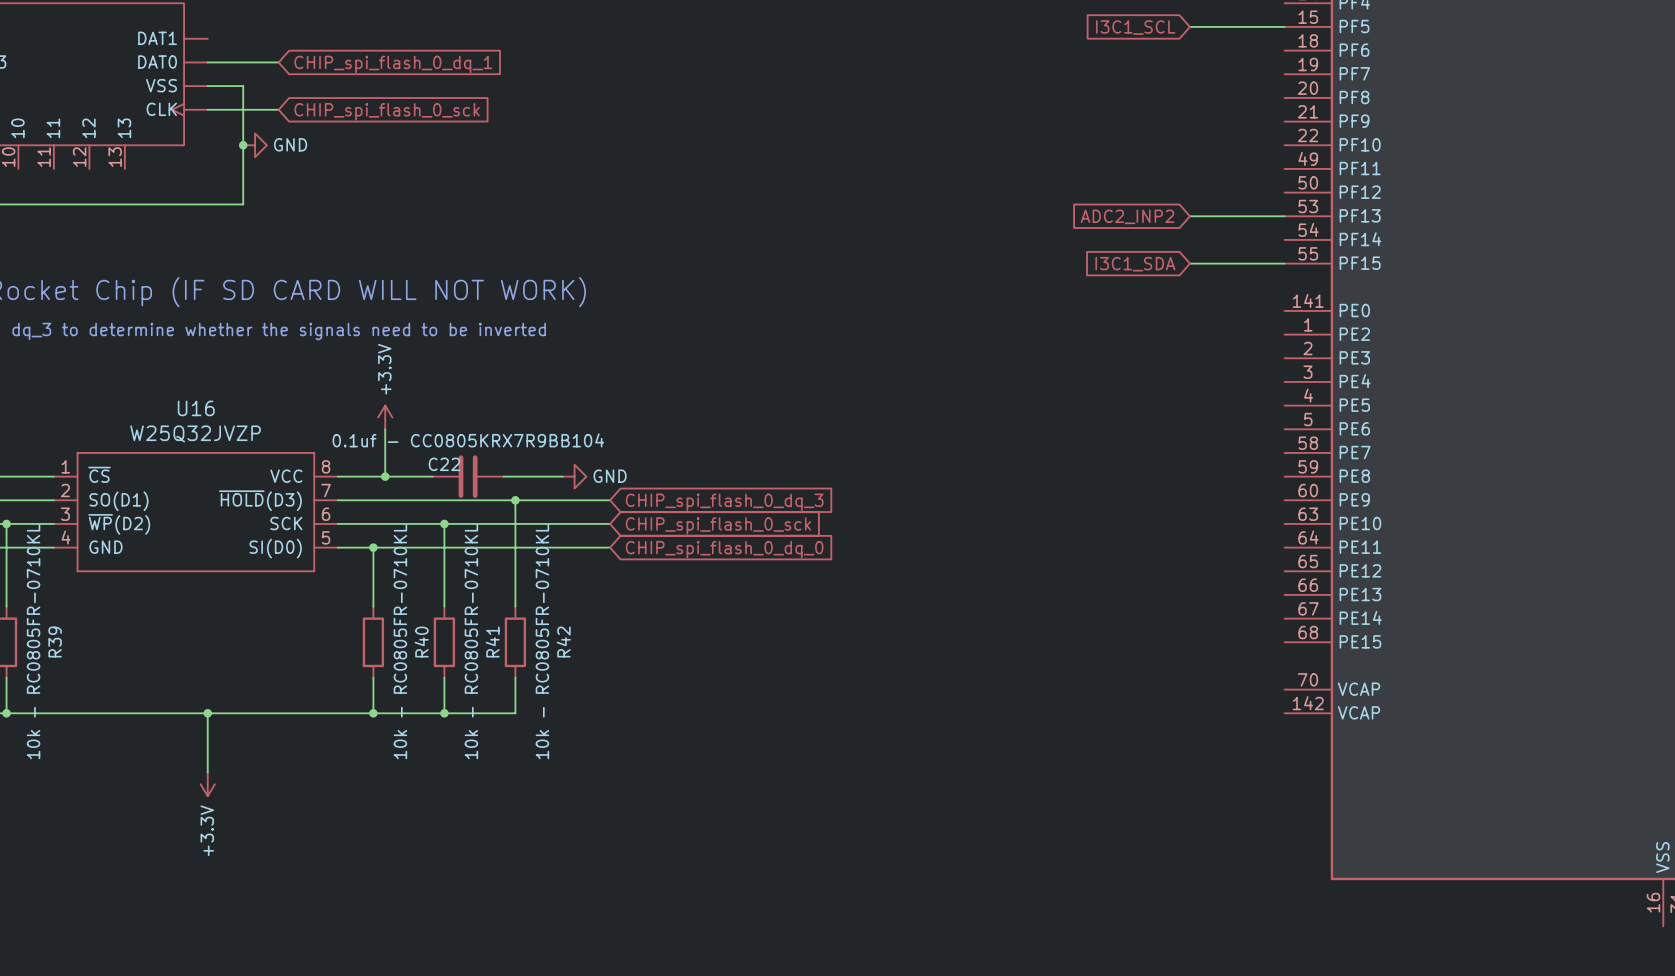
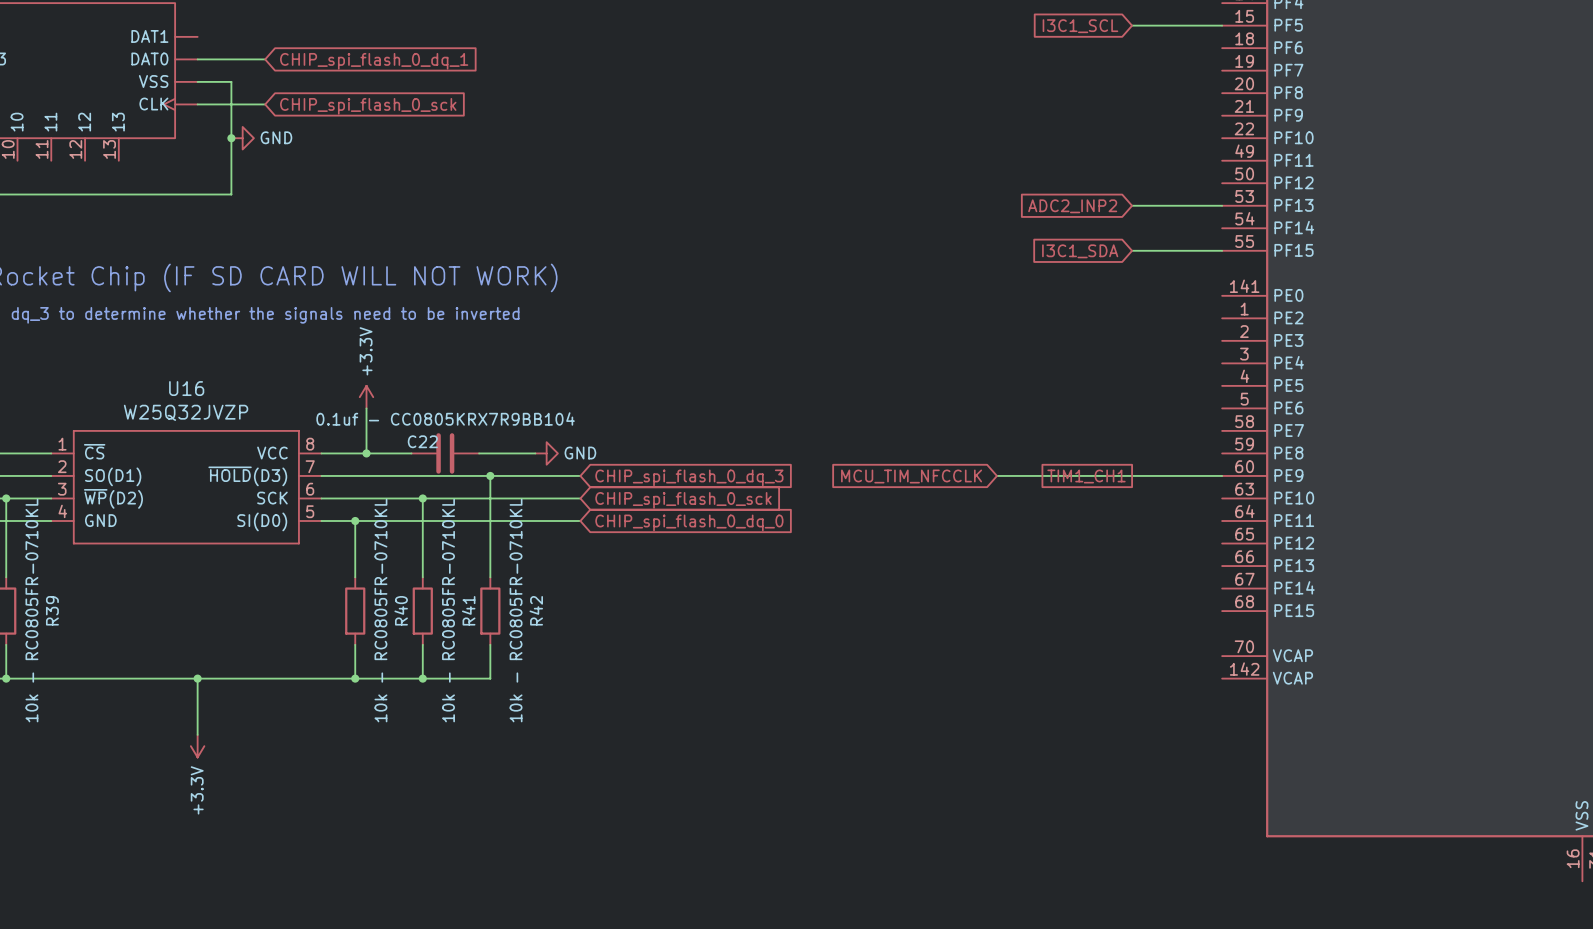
global label: none -> MCU_TIM_NFCCLK (911, 476)
wire: none -> (996, 475) (1222, 475)
global label: none -> TIM1_CH1 (1086, 476)

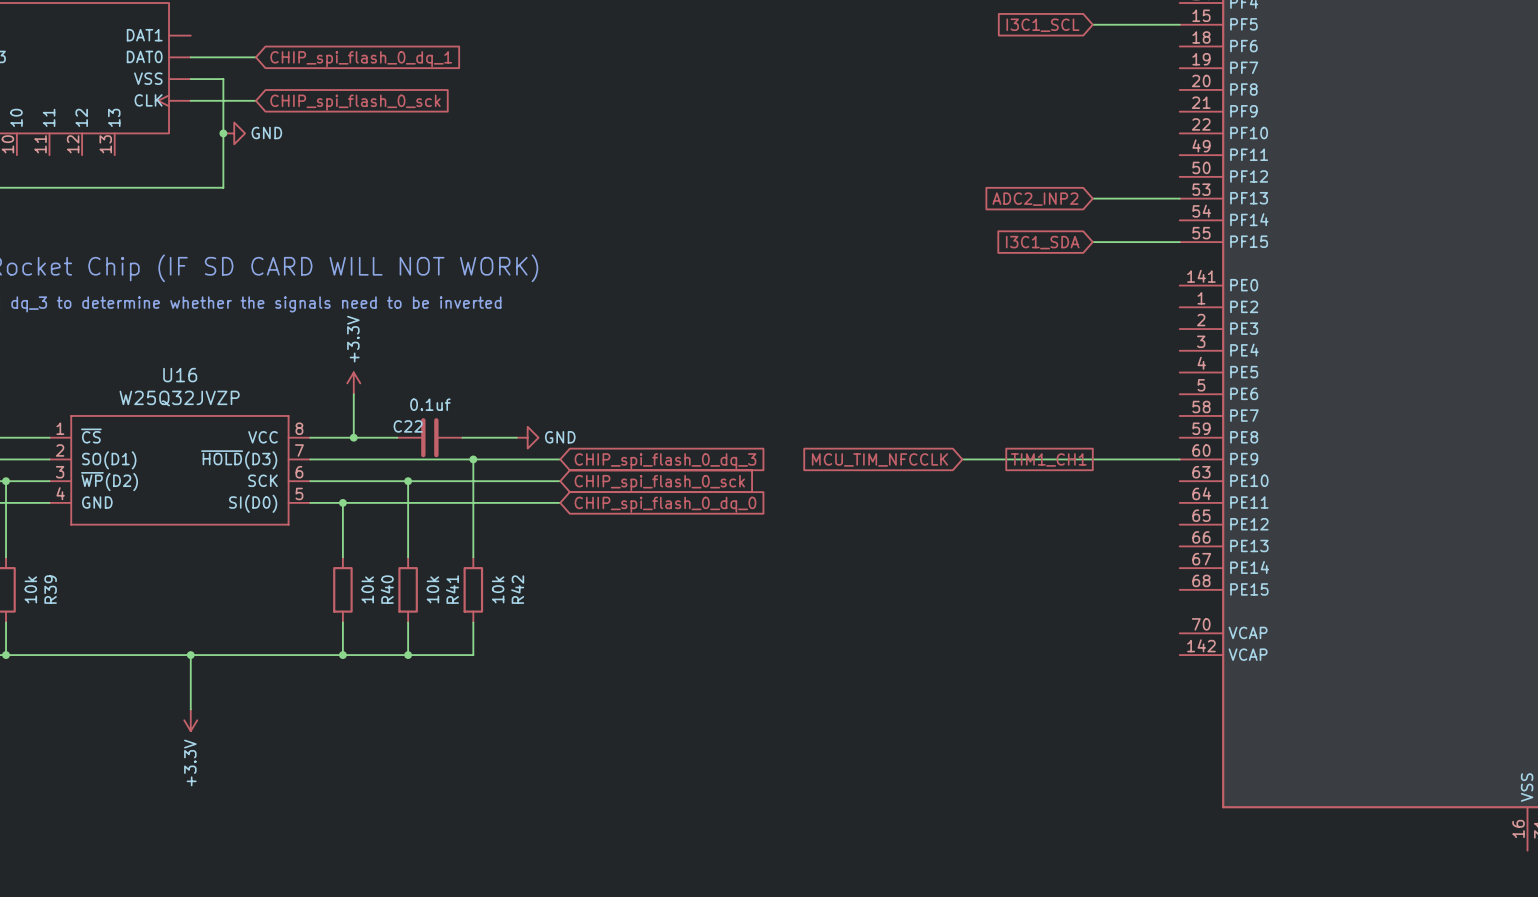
C22 value: 0.1uf - CC0805KRX7R9BB104 (445, 418) -> 0.1uf (430, 404)
R39 value: 10k - RC0805FR-0710KL (31, 610) -> 10k (30, 589)
R40 value: 10k - RC0805FR-0710KL (380, 610) -> 10k (367, 589)
R41 value: 10k - RC0805FR-0710KL (448, 610) -> 10k (432, 589)
R42 value: 10k - RC0805FR-0710KL (516, 610) -> 10k (498, 589)

